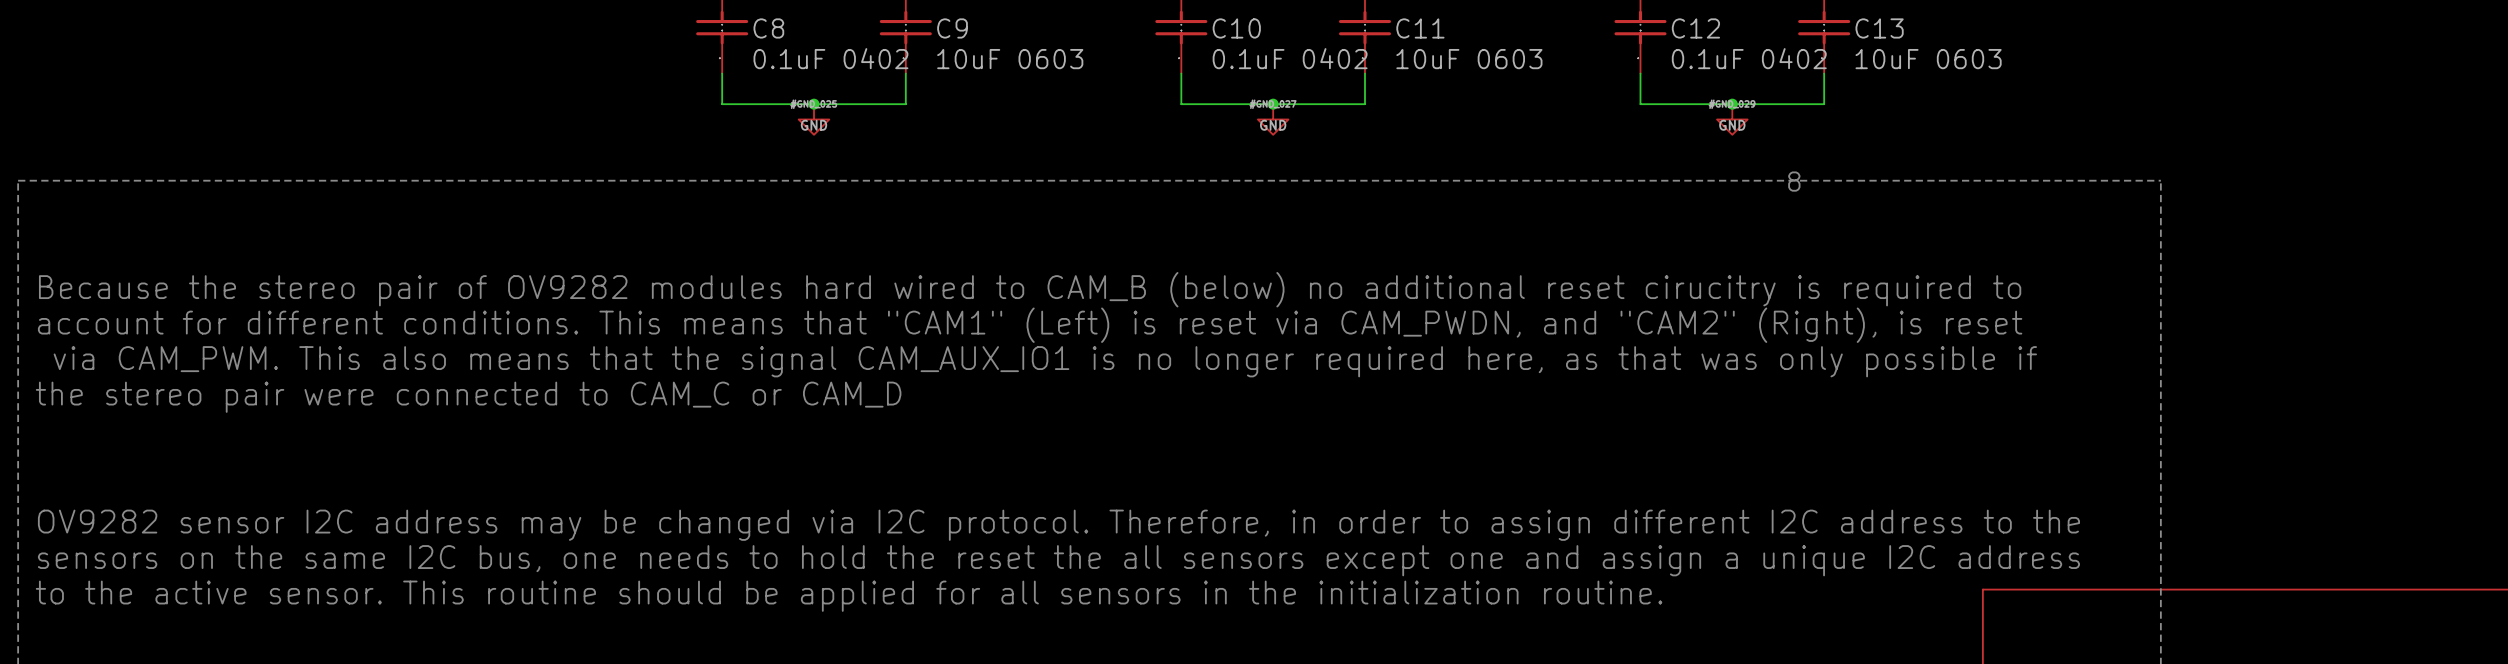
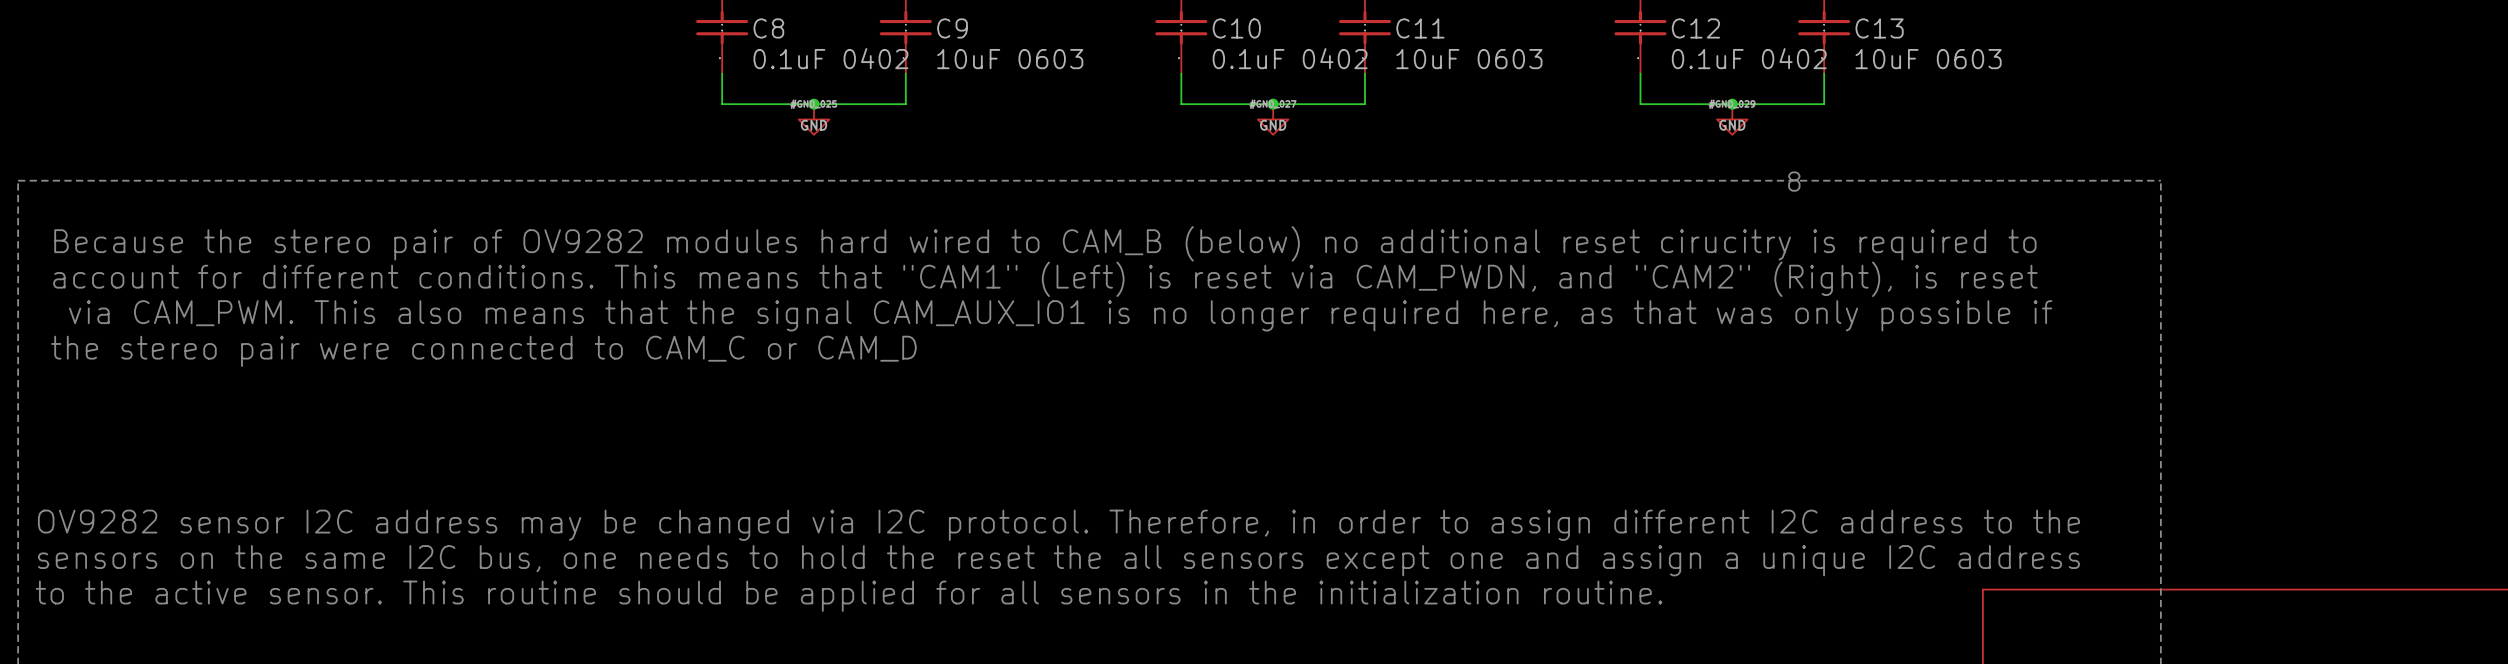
text position: Because the stereo pair of OV9282 modules hard wired to CAM_B (below) no additional reset cirucitry is required to (1030, 289) -> Because the stereo pair of OV9282 modules hard wired to CAM_B (below) no additional reset cirucitry is required to (1045, 243)
text position: account for different conditions. This means that "CAM1" (Left) is reset via CAM_PWDN, and "CAM2" (Right), is reset (1030, 325) -> account for different conditions. This means that "CAM1" (Left) is reset via CAM_PWDN, and "CAM2" (Right), is reset (1045, 279)
text position: via CAM_PWM. This also means that the signal CAM_AUX_IO1 is no longer required here, as that was only possible if (1045, 361) -> via CAM_PWM. This also means that the signal CAM_AUX_IO1 is no longer required here, as that was only possible if (1060, 315)
text position: the stereo pair were connected to CAM_C or CAM_D (468, 397) -> the stereo pair were connected to CAM_C or CAM_D (483, 351)

